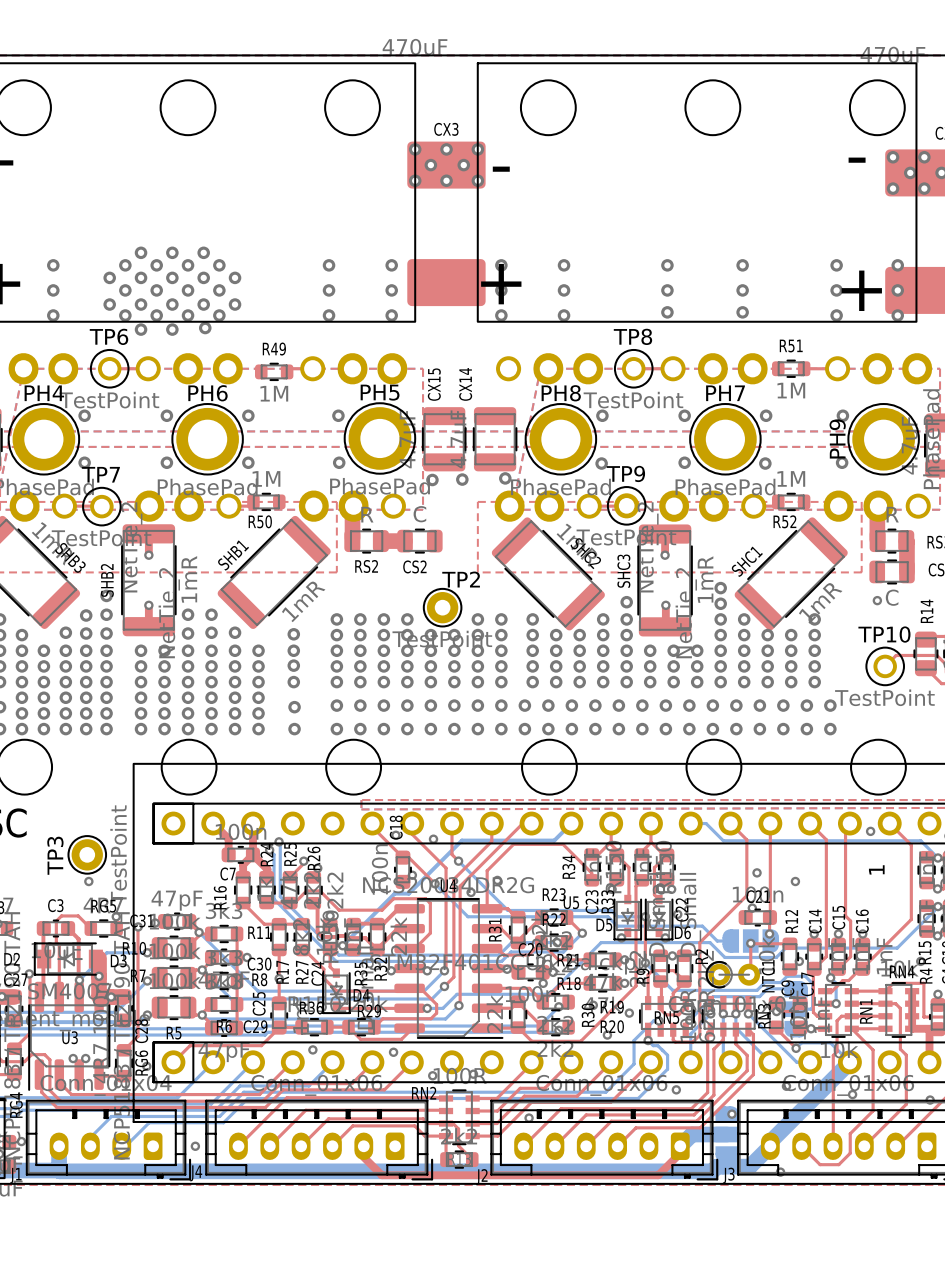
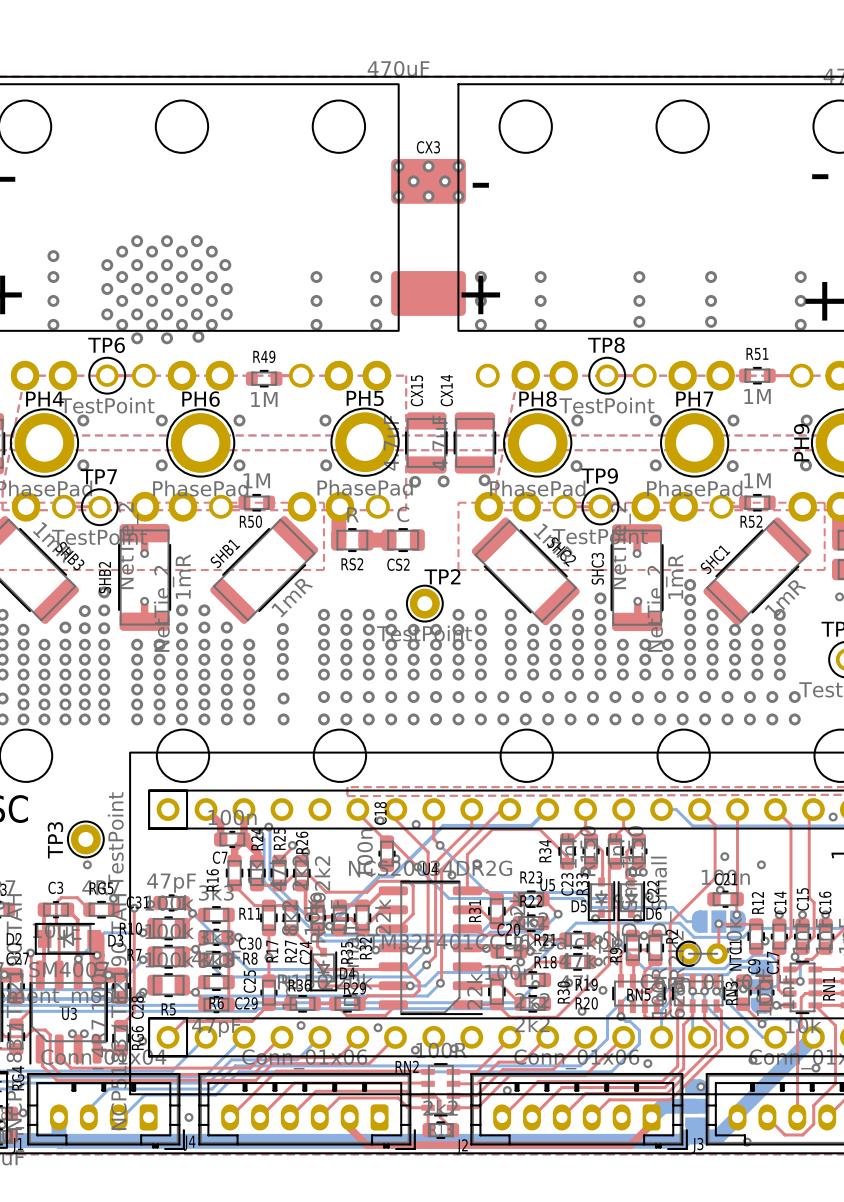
via: none -> (137, 241)
via: none -> (167, 241)
via: none -> (196, 241)
via: none -> (122, 251)
via: none -> (152, 251)
via: none -> (181, 251)
via: none -> (211, 251)
via: none -> (53, 256)
via: none -> (107, 265)
via: none -> (225, 265)

